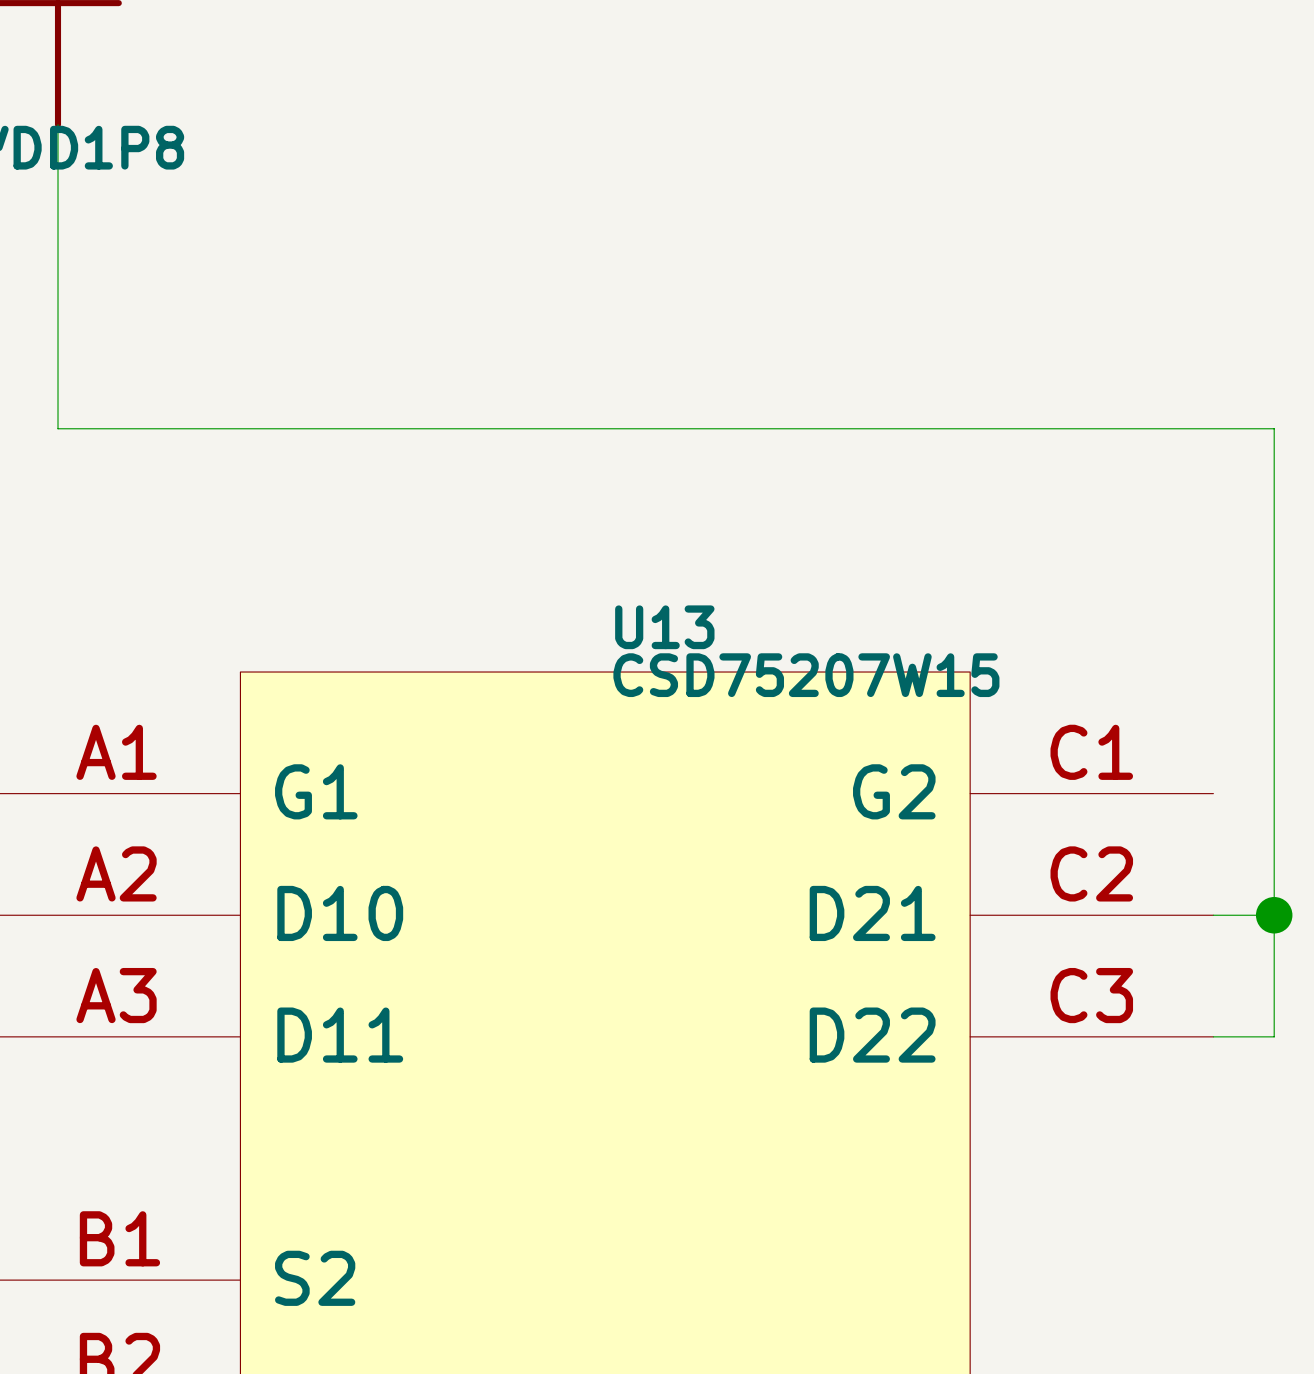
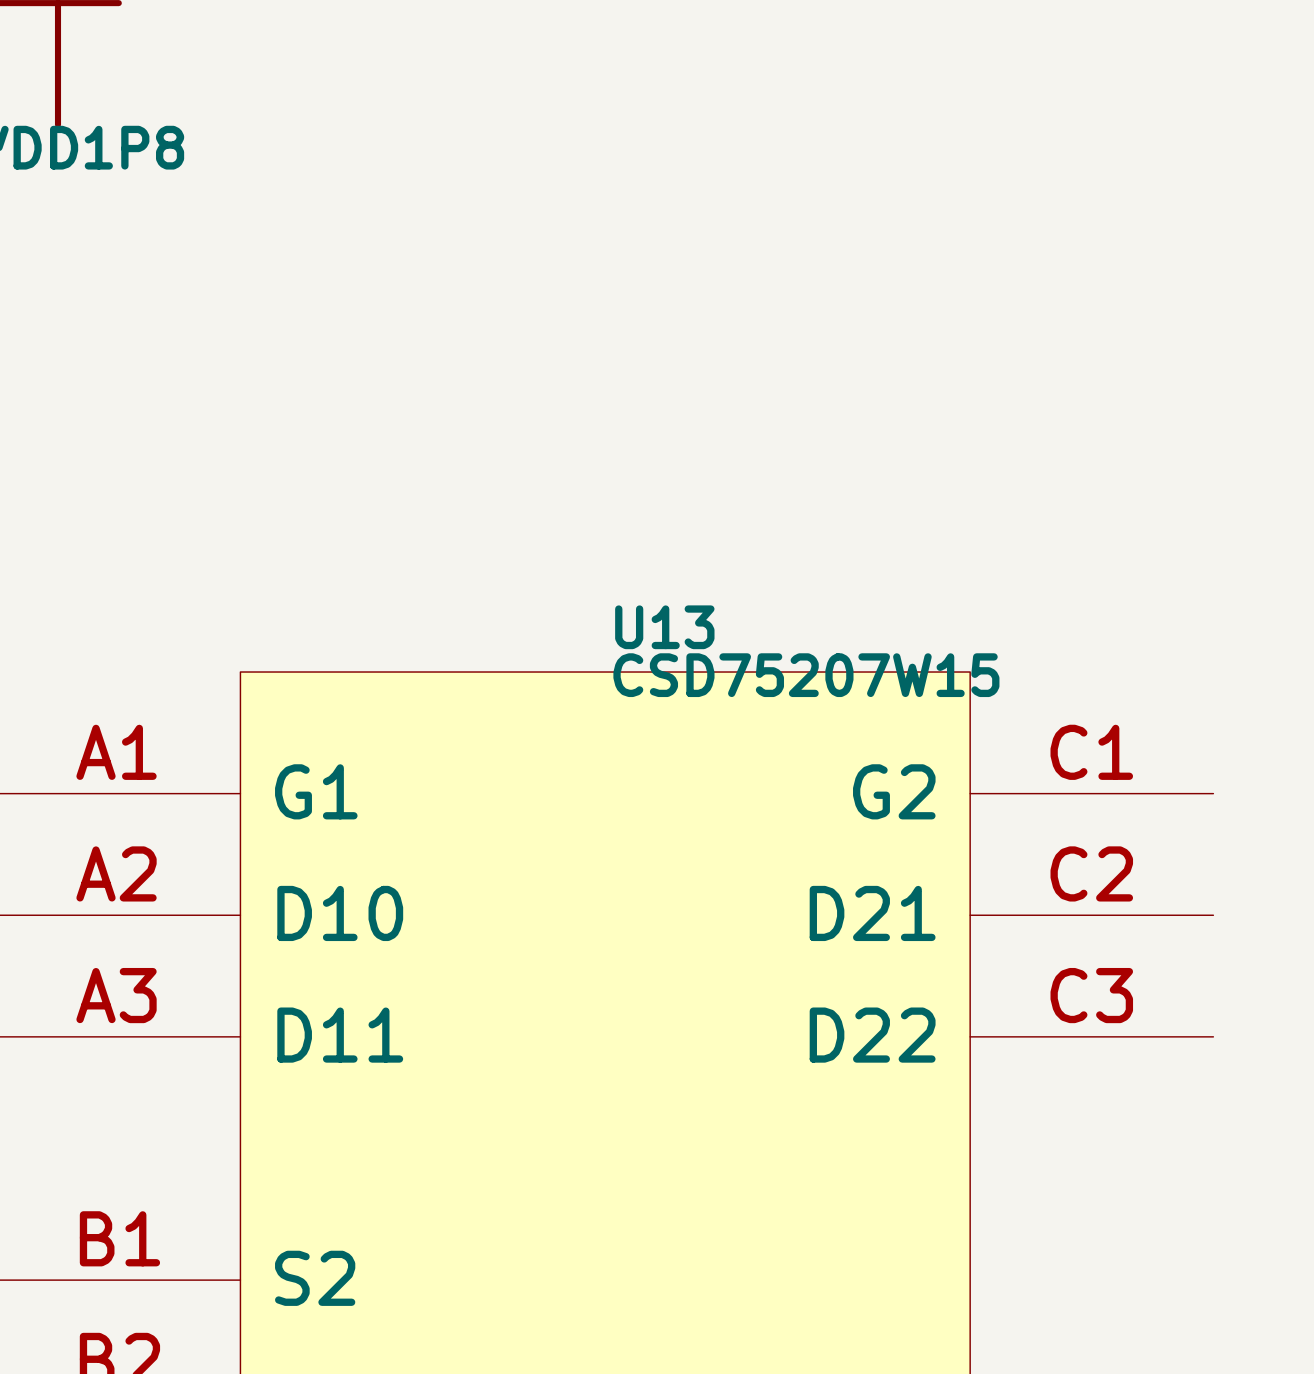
wire: (58, 124) (58, 428) (1274, 428) (1274, 1036) (1213, 1036) -> none
wire: (1213, 915) (1274, 915) -> none
junction: (1274, 915) -> none

